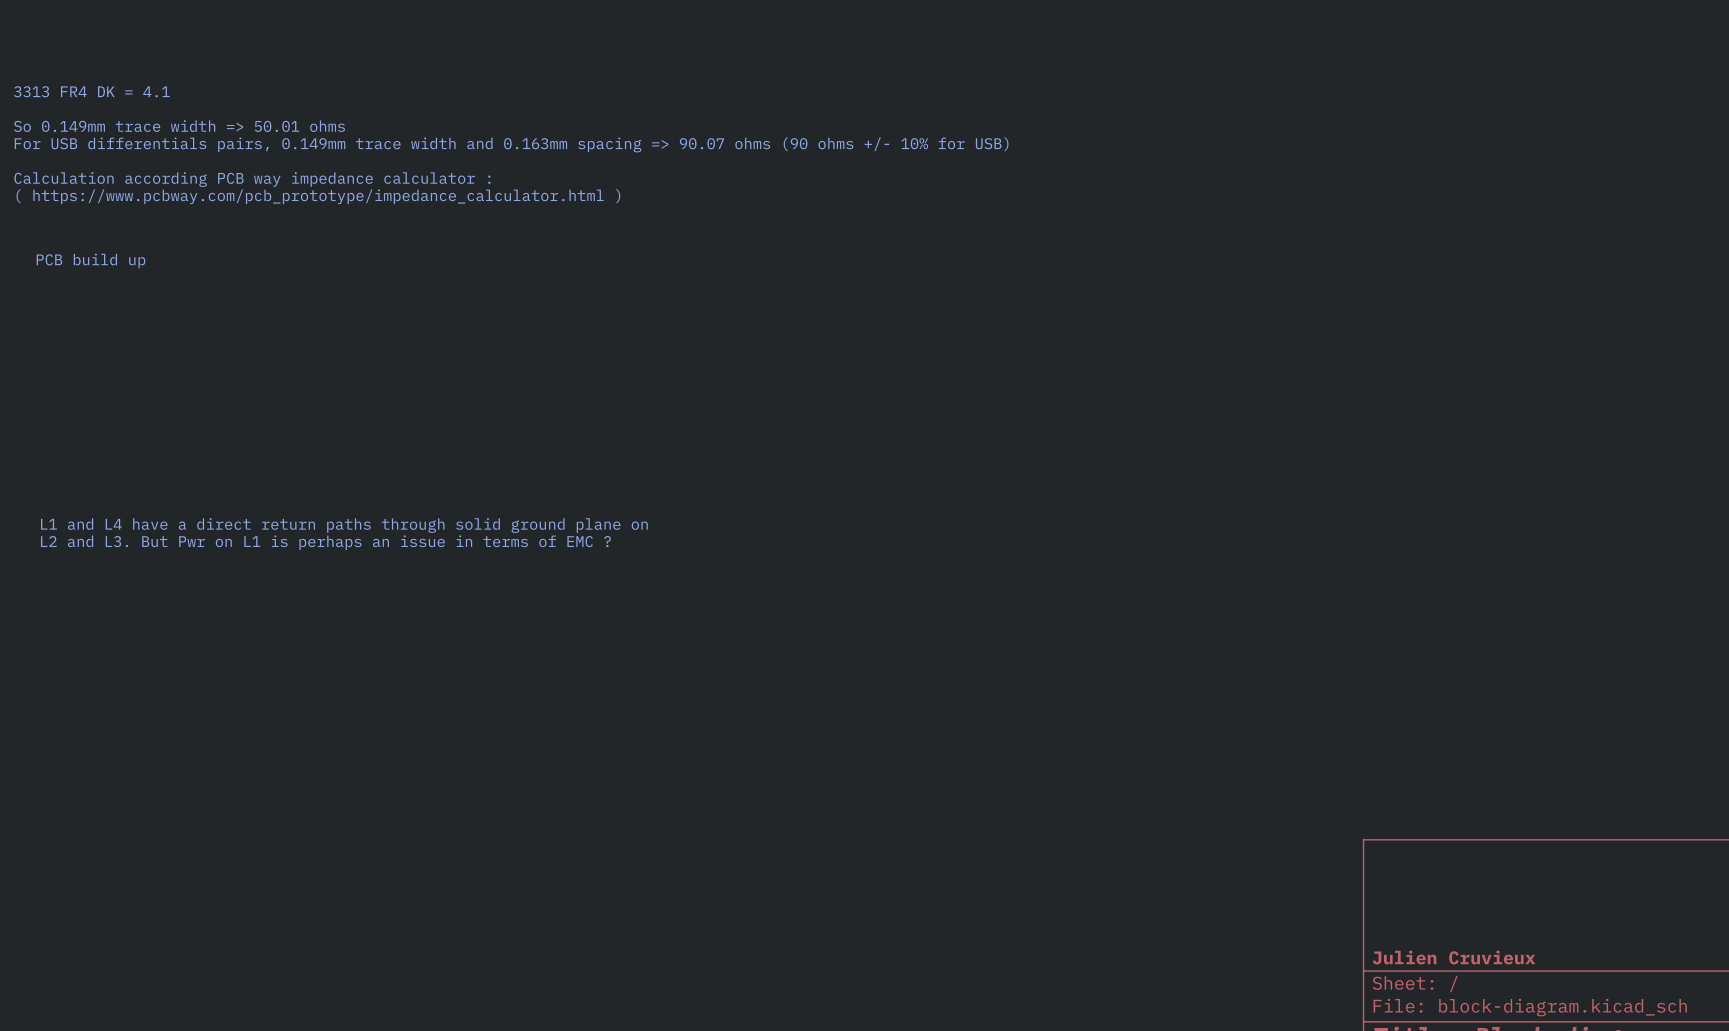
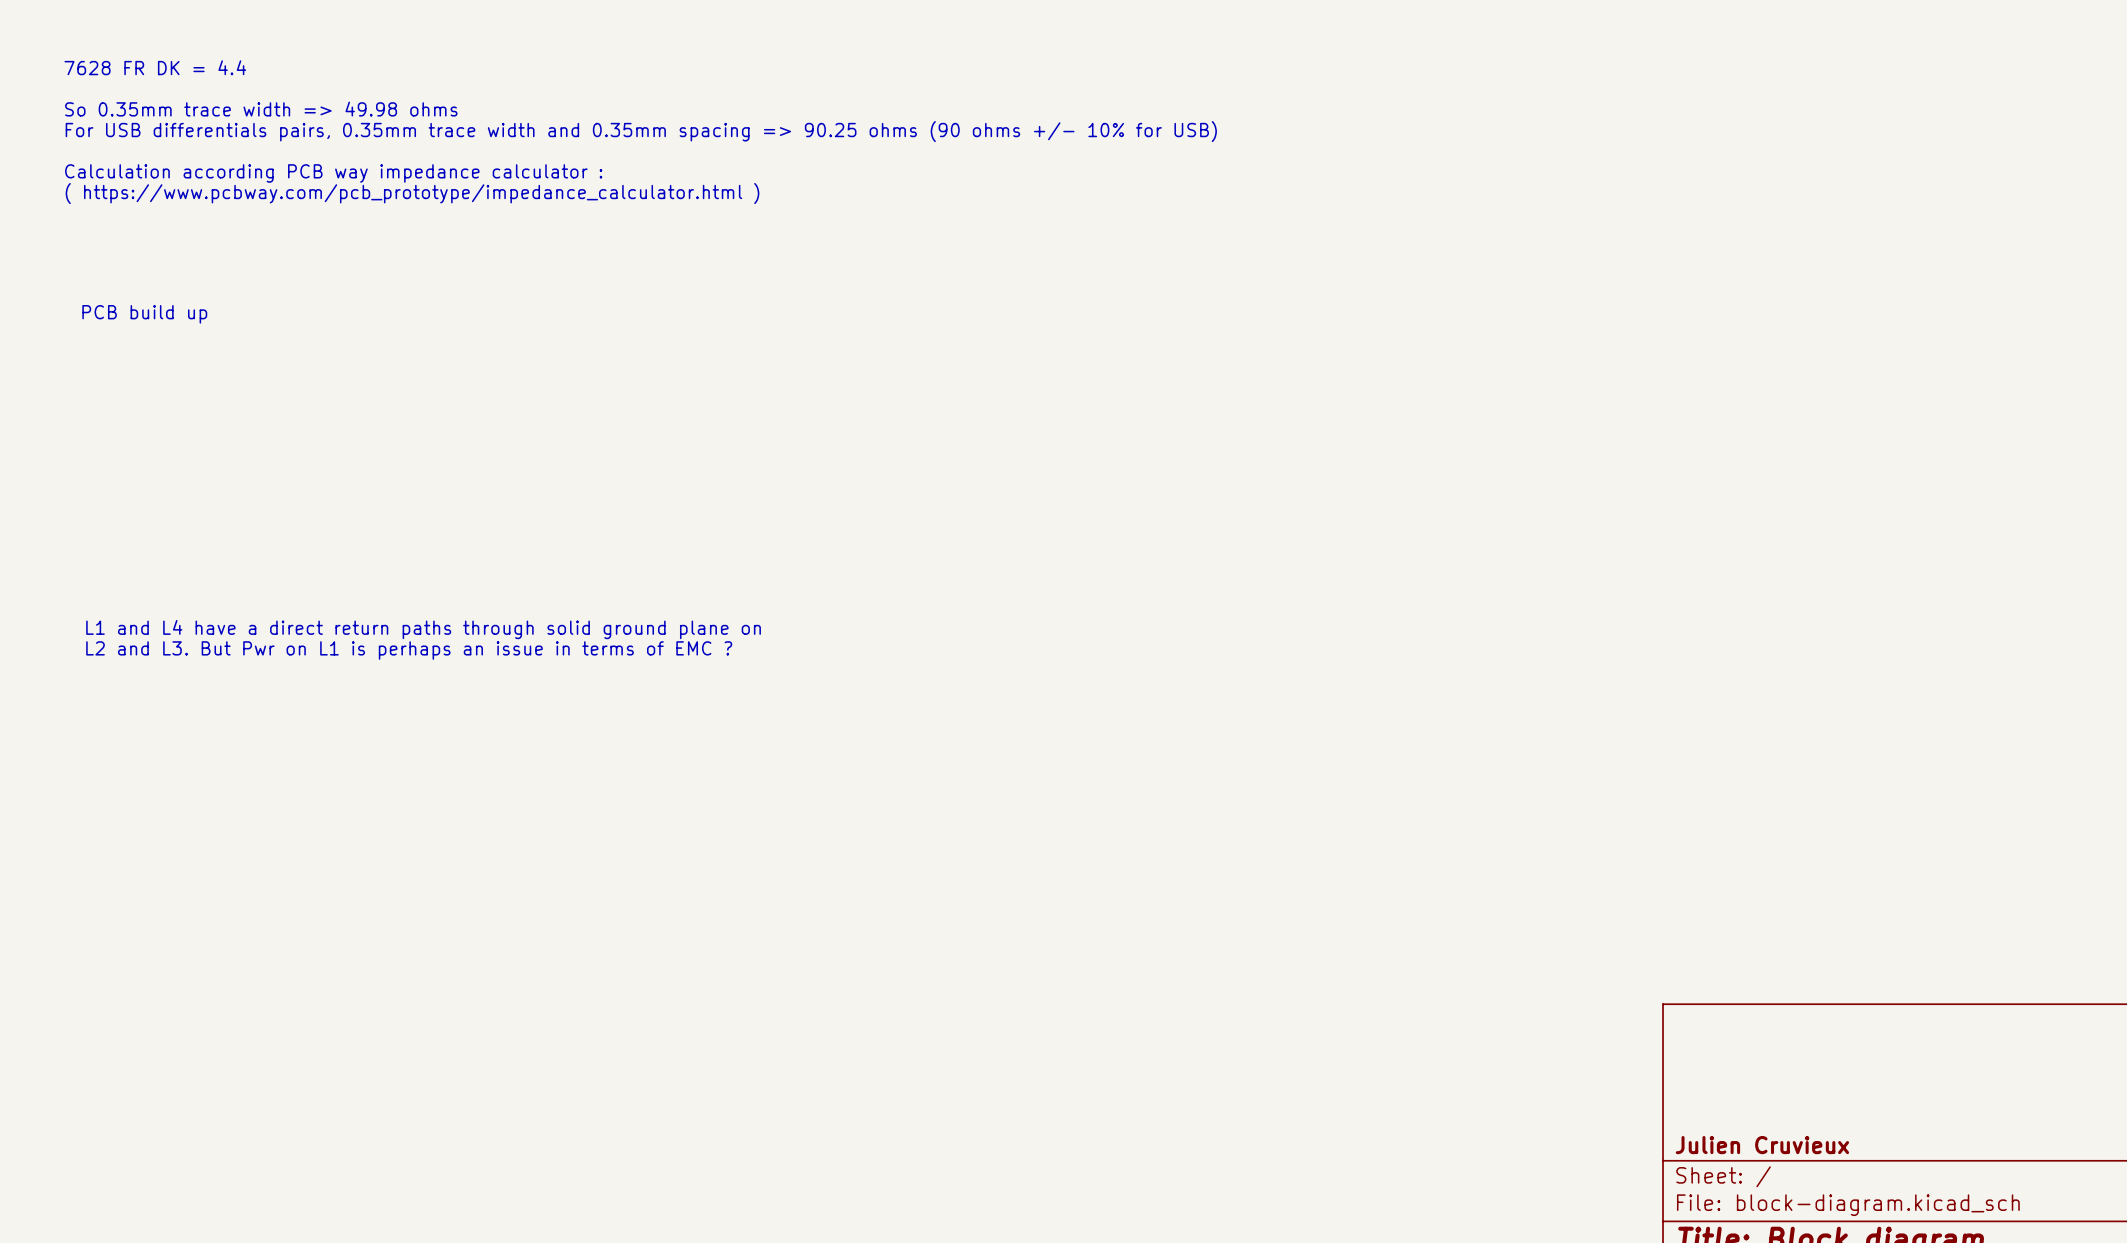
text: none -> 7628 FR DK = 4.4 (155, 67)
text: none -> So 0.35mm trace width => 49.98 ohms (261, 109)
text: 3313 FR4 DK = 4.1 (91, 91) -> none
text: none -> For USB differentials pairs, 0.35mm trace width and 0.35mm spacing => 90.25 ohms (90 ohms +/- 10% for USB) (641, 131)
text: So 0.149mm trace width => 50.01 ohms (179, 126) -> none
text: For USB differentials pairs, 0.149mm trace width and 0.163mm spacing => 90.07 ohms (90 ohms +/- 10% for USB) (511, 144) -> none
text position: Calculation according PCB way impedance calculator : (252, 179) -> Calculation according PCB way impedance calculator : (333, 173)
text position: ( https://www.pcbway.com/pcb_prototype/impedance_calculator.html ) (318, 196) -> ( https://www.pcbway.com/pcb_prototype/impedance_calculator.html ) (412, 193)

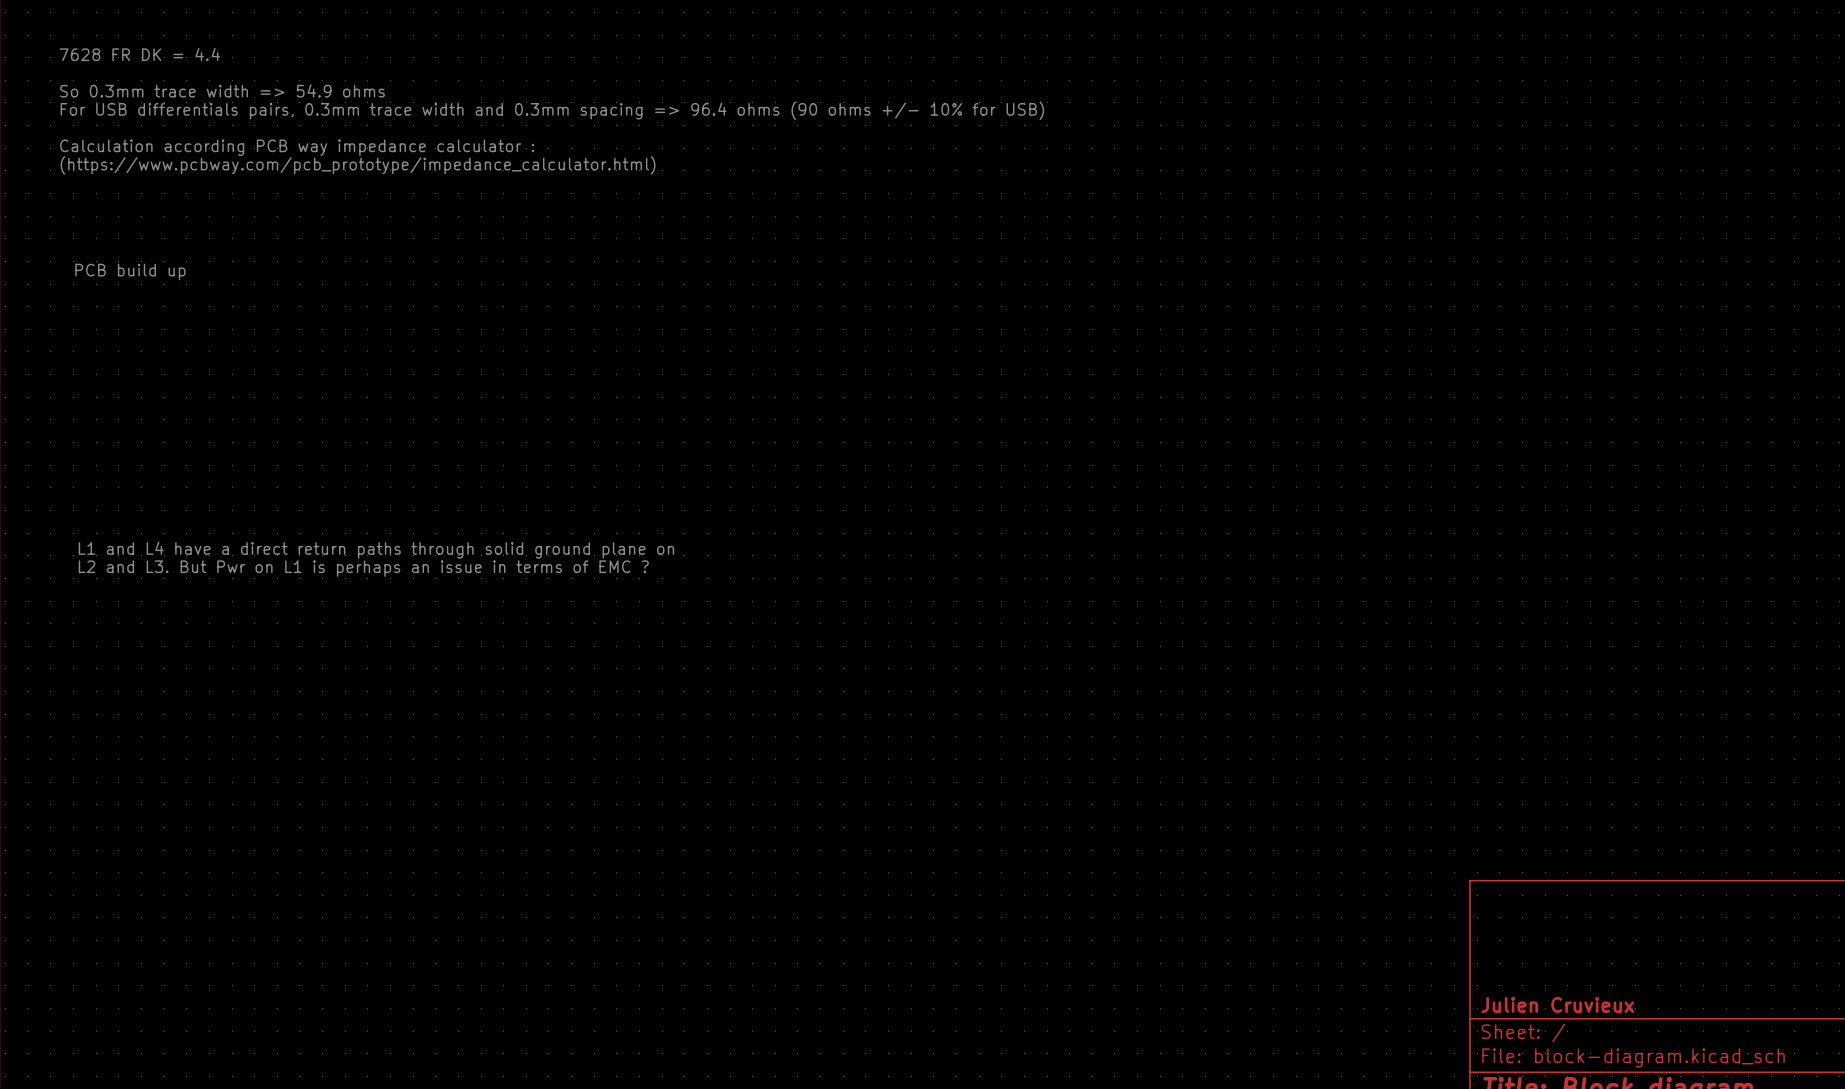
text: So 0.35mm trace width => 49.98 ohms (261, 109) -> So 0.3mm trace width => 54.9 ohms (222, 90)
text: For USB differentials pairs, 0.35mm trace width and 0.35mm spacing => 90.25 ohms (90 ohms +/- 10% for USB) (641, 131) -> For USB differentials pairs, 0.3mm trace width and 0.3mm spacing => 96.4 ohms (90 ohms +/- 10% for USB) (552, 110)
text: ( https://www.pcbway.com/pcb_prototype/impedance_calculator.html ) (412, 193) -> (https://www.pcbway.com/pcb_prototype/impedance_calculator.html) (358, 165)

